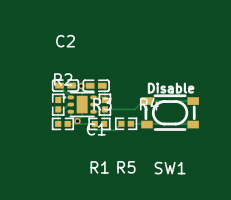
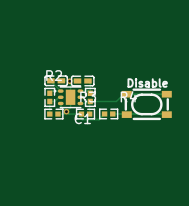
C2 name: C2 (65, 41) -> none
SW1: (170, 112) -> none
R1 name: R1 (99, 167) -> none
R5 name: R5 (126, 167) -> none

